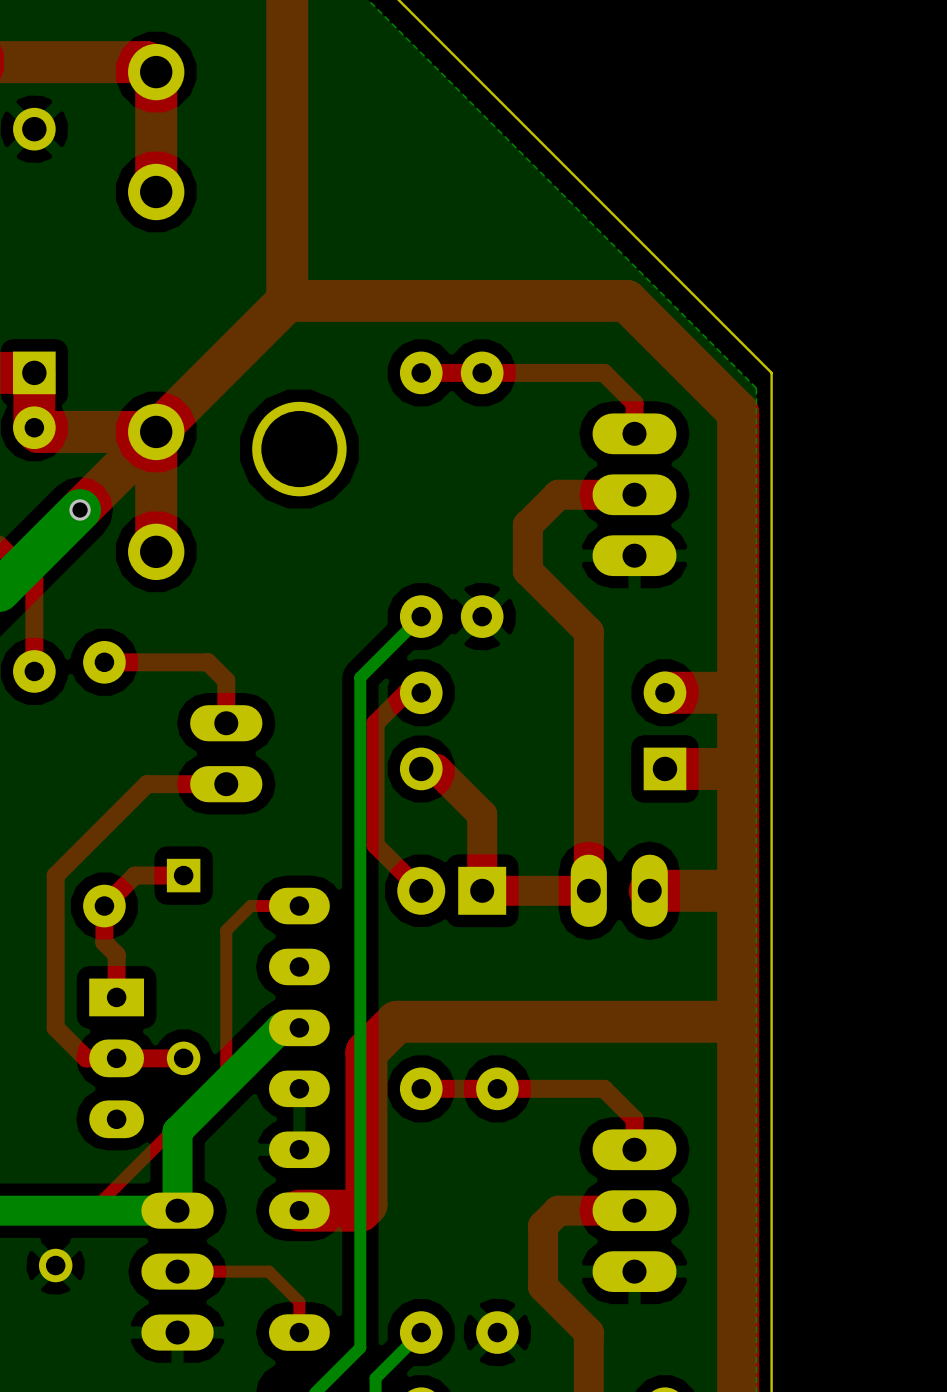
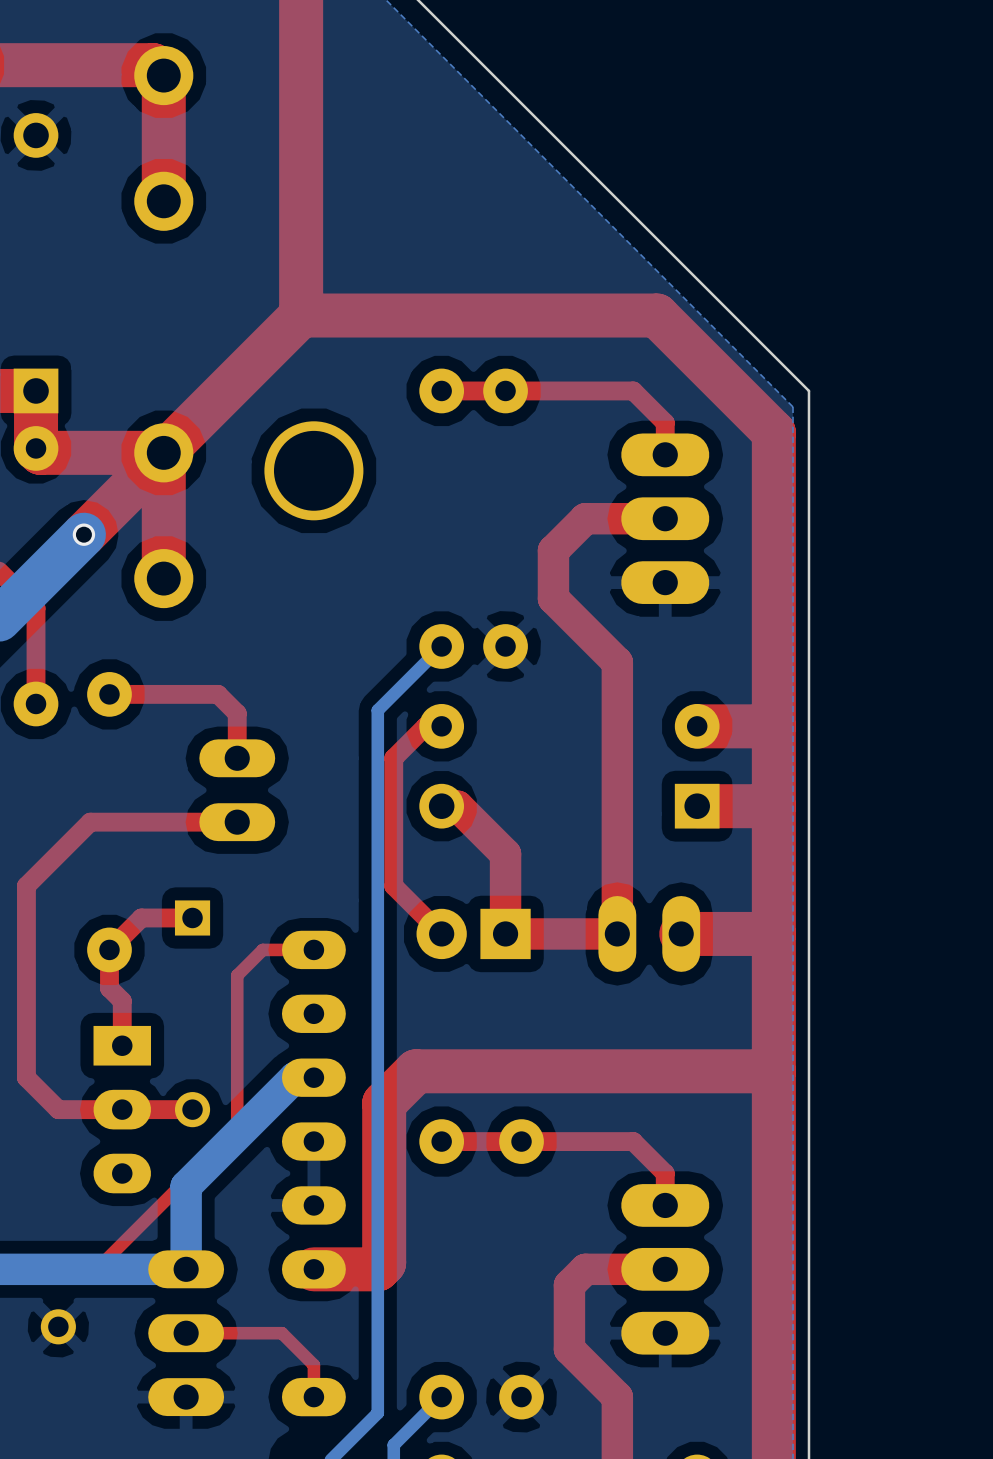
top track: (147, 784) (55, 875) (55, 1027) (86, 1058) -> (154, 822) (90, 822) (26, 886) (26, 1077) (58, 1109) (90, 1109)

